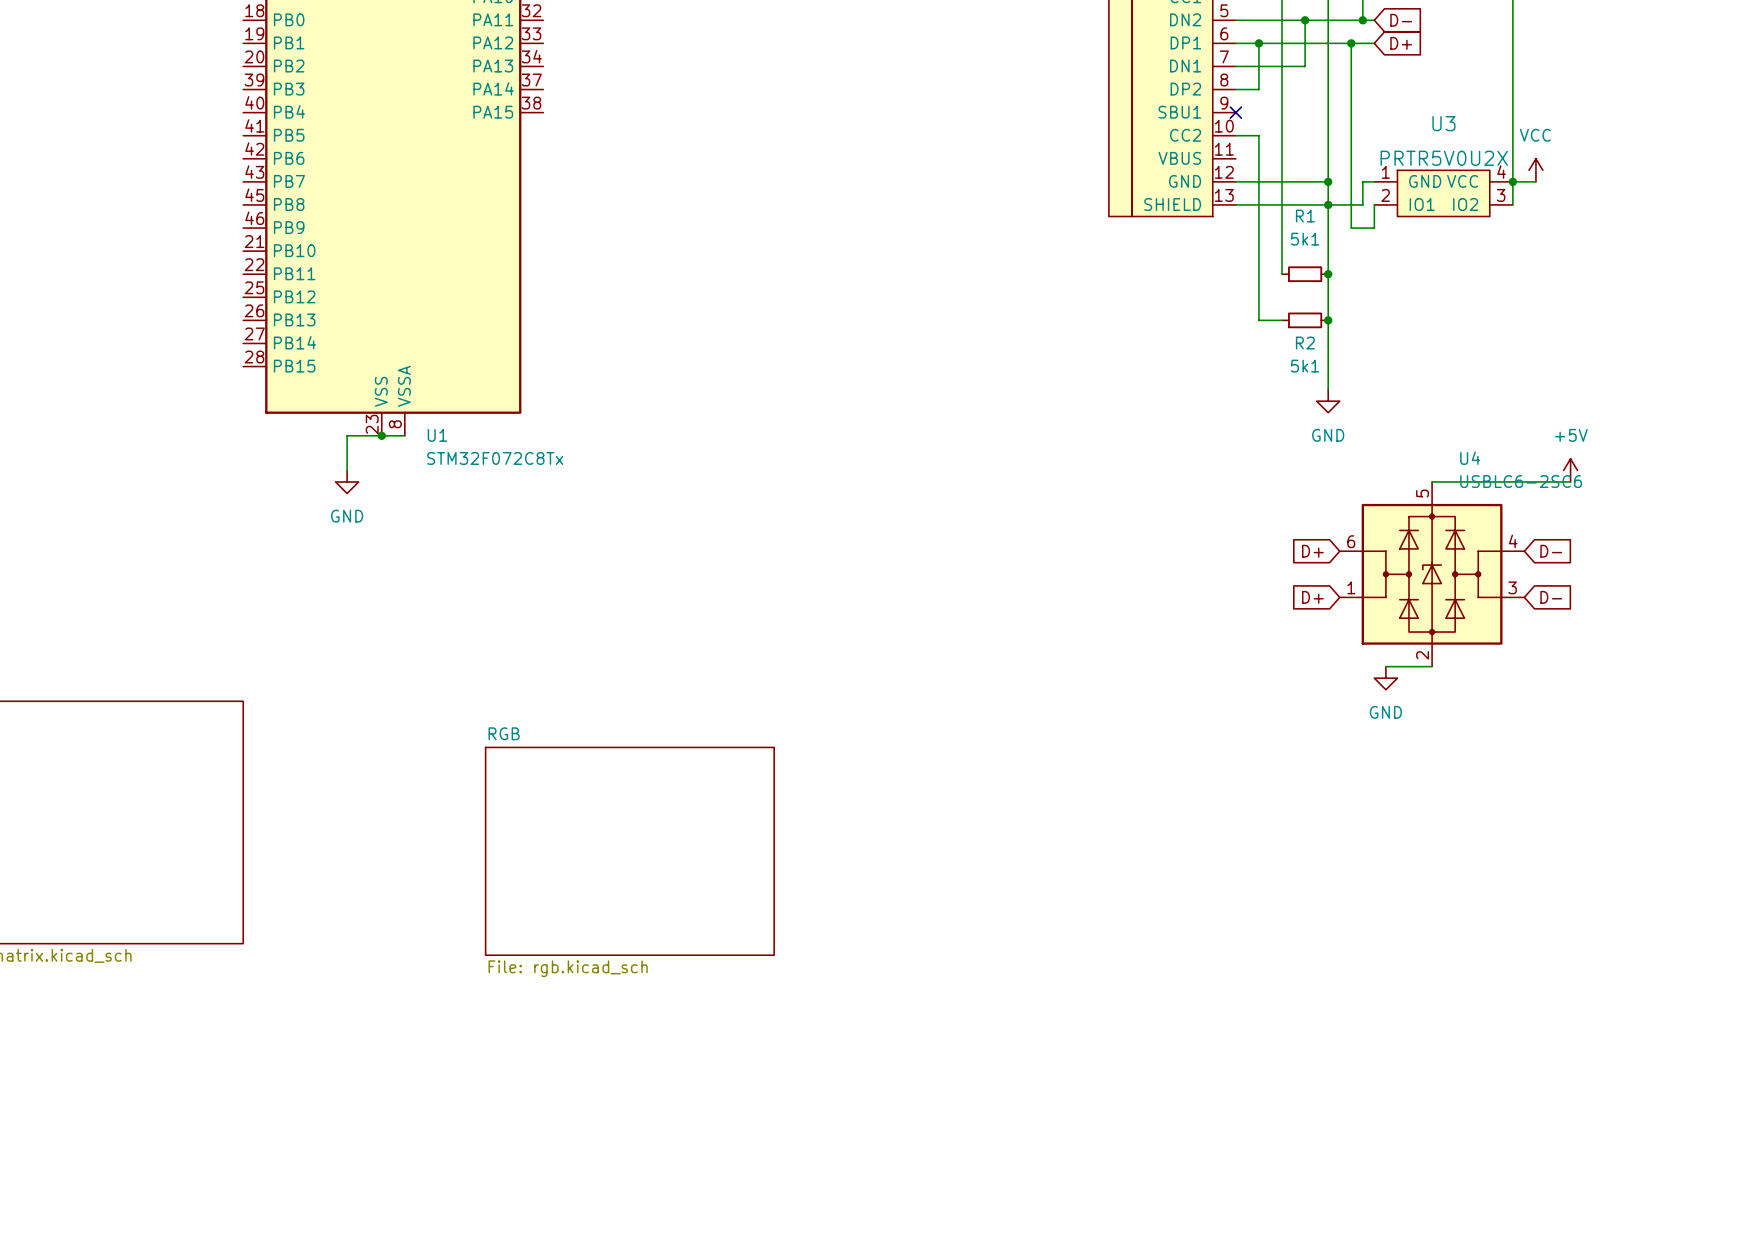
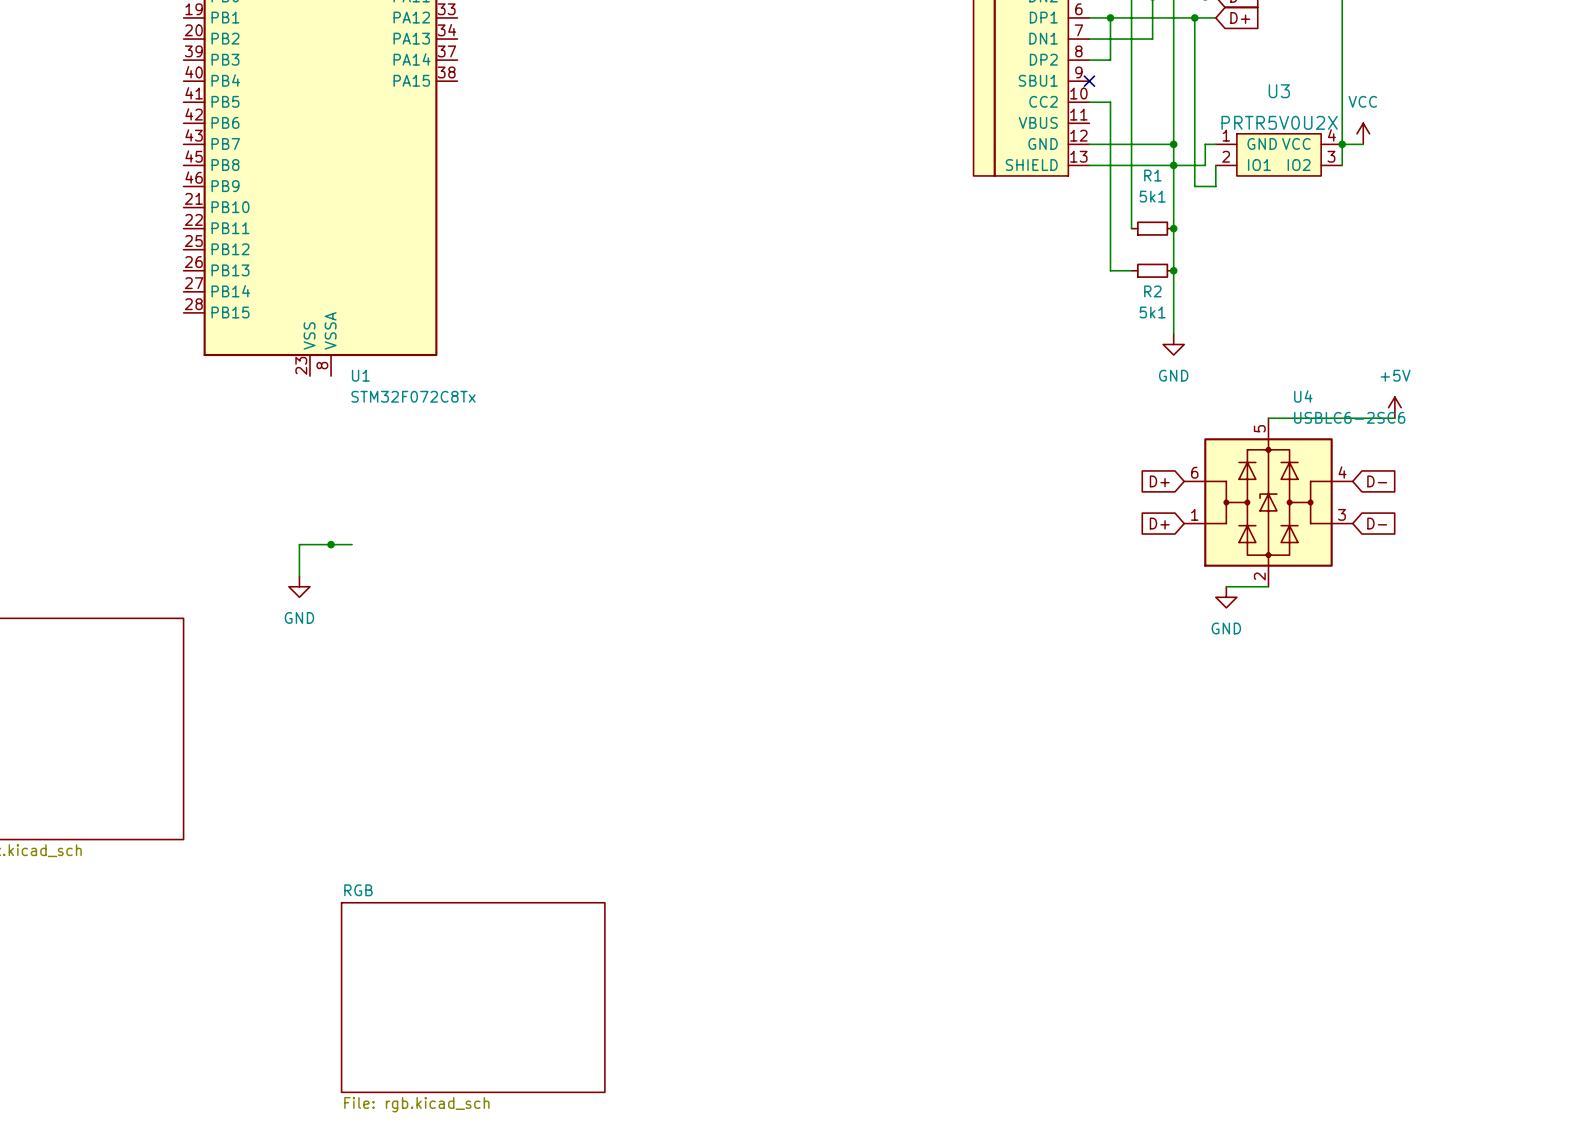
junction: (381, 435) -> none
wire: (404, 435) (347, 435) (347, 470) -> (352, 544) (299, 544) (299, 576)
power symbol position: GND (347, 481) -> GND (299, 586)
junction: none -> (331, 544)
sheet RGB: File: rgb.kicad_sch (629, 851) -> none
sheet RGB: none -> File: rgb.kicad_sch (473, 997)

